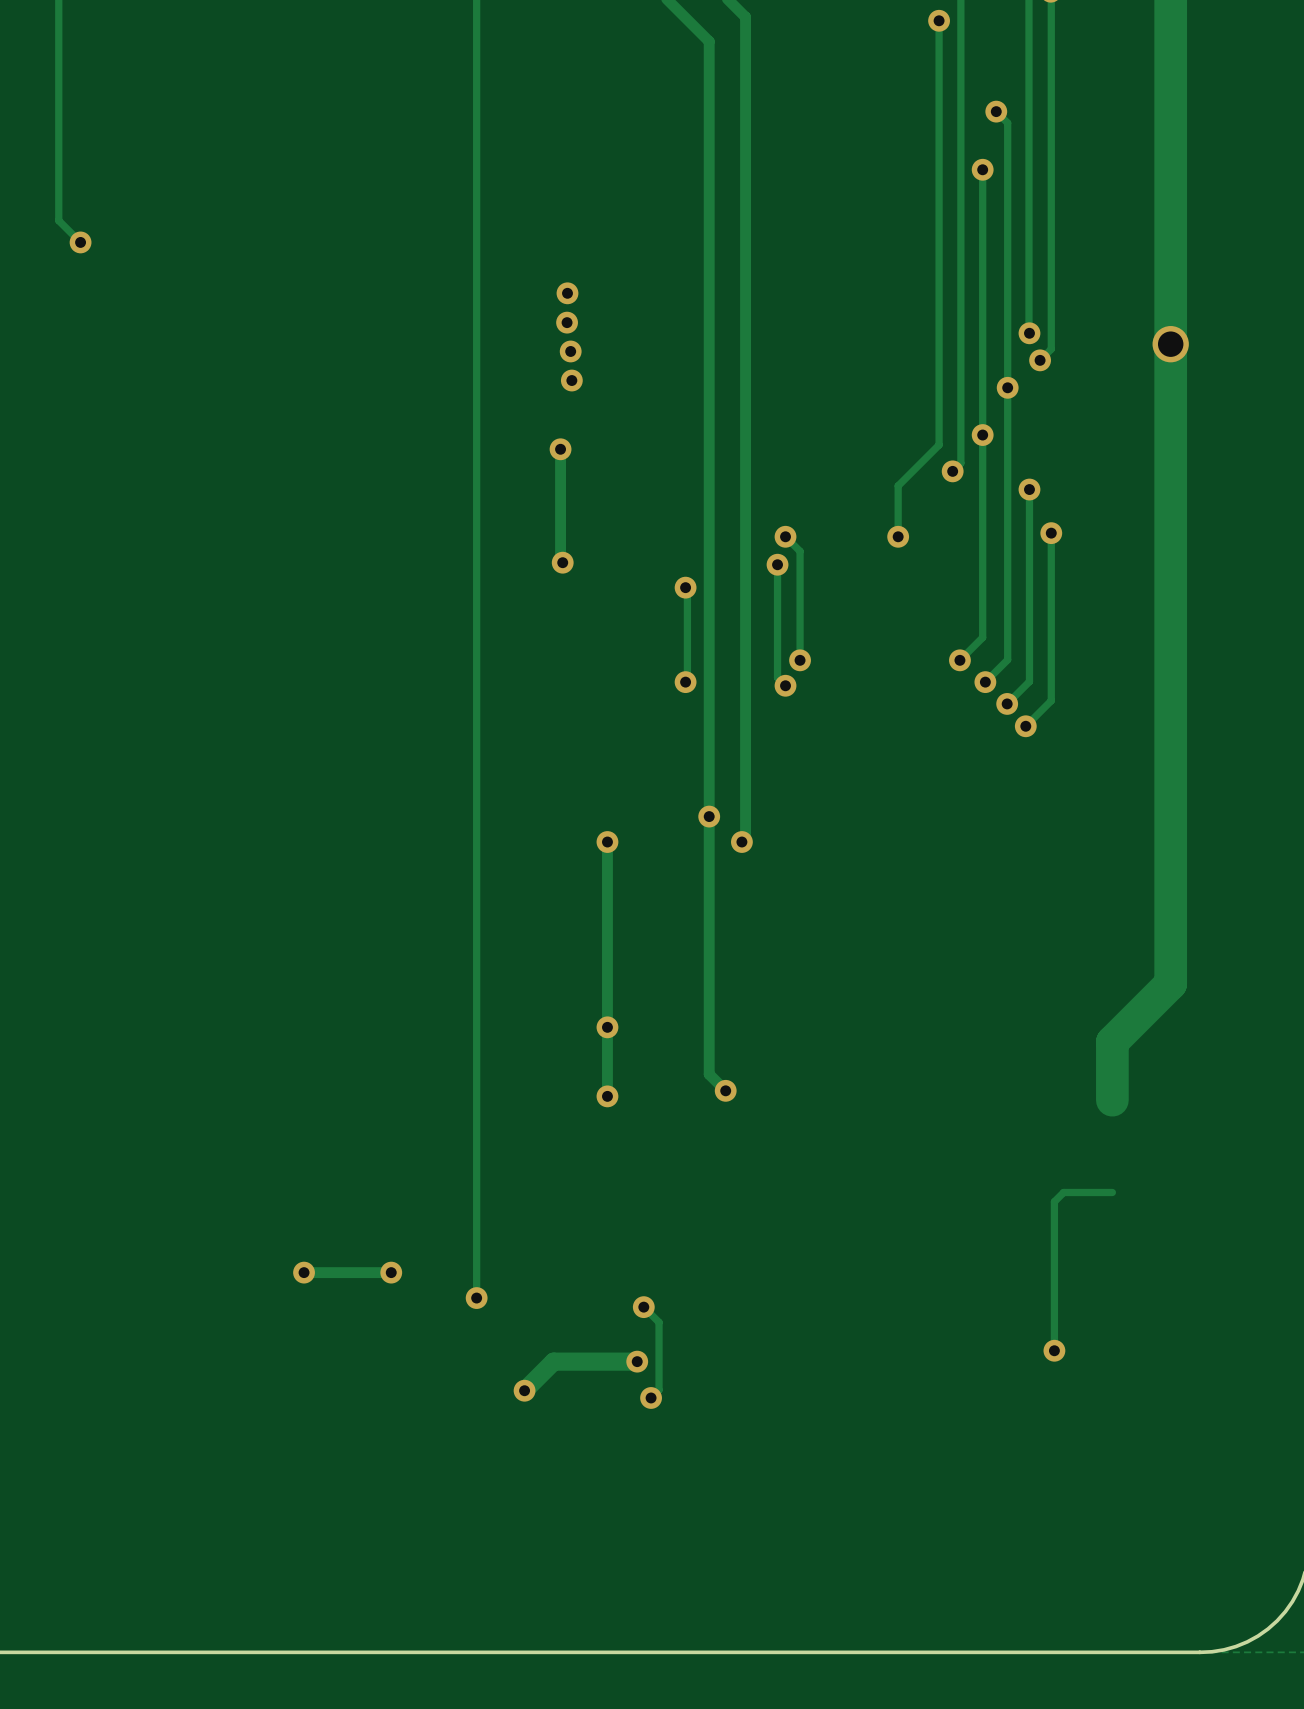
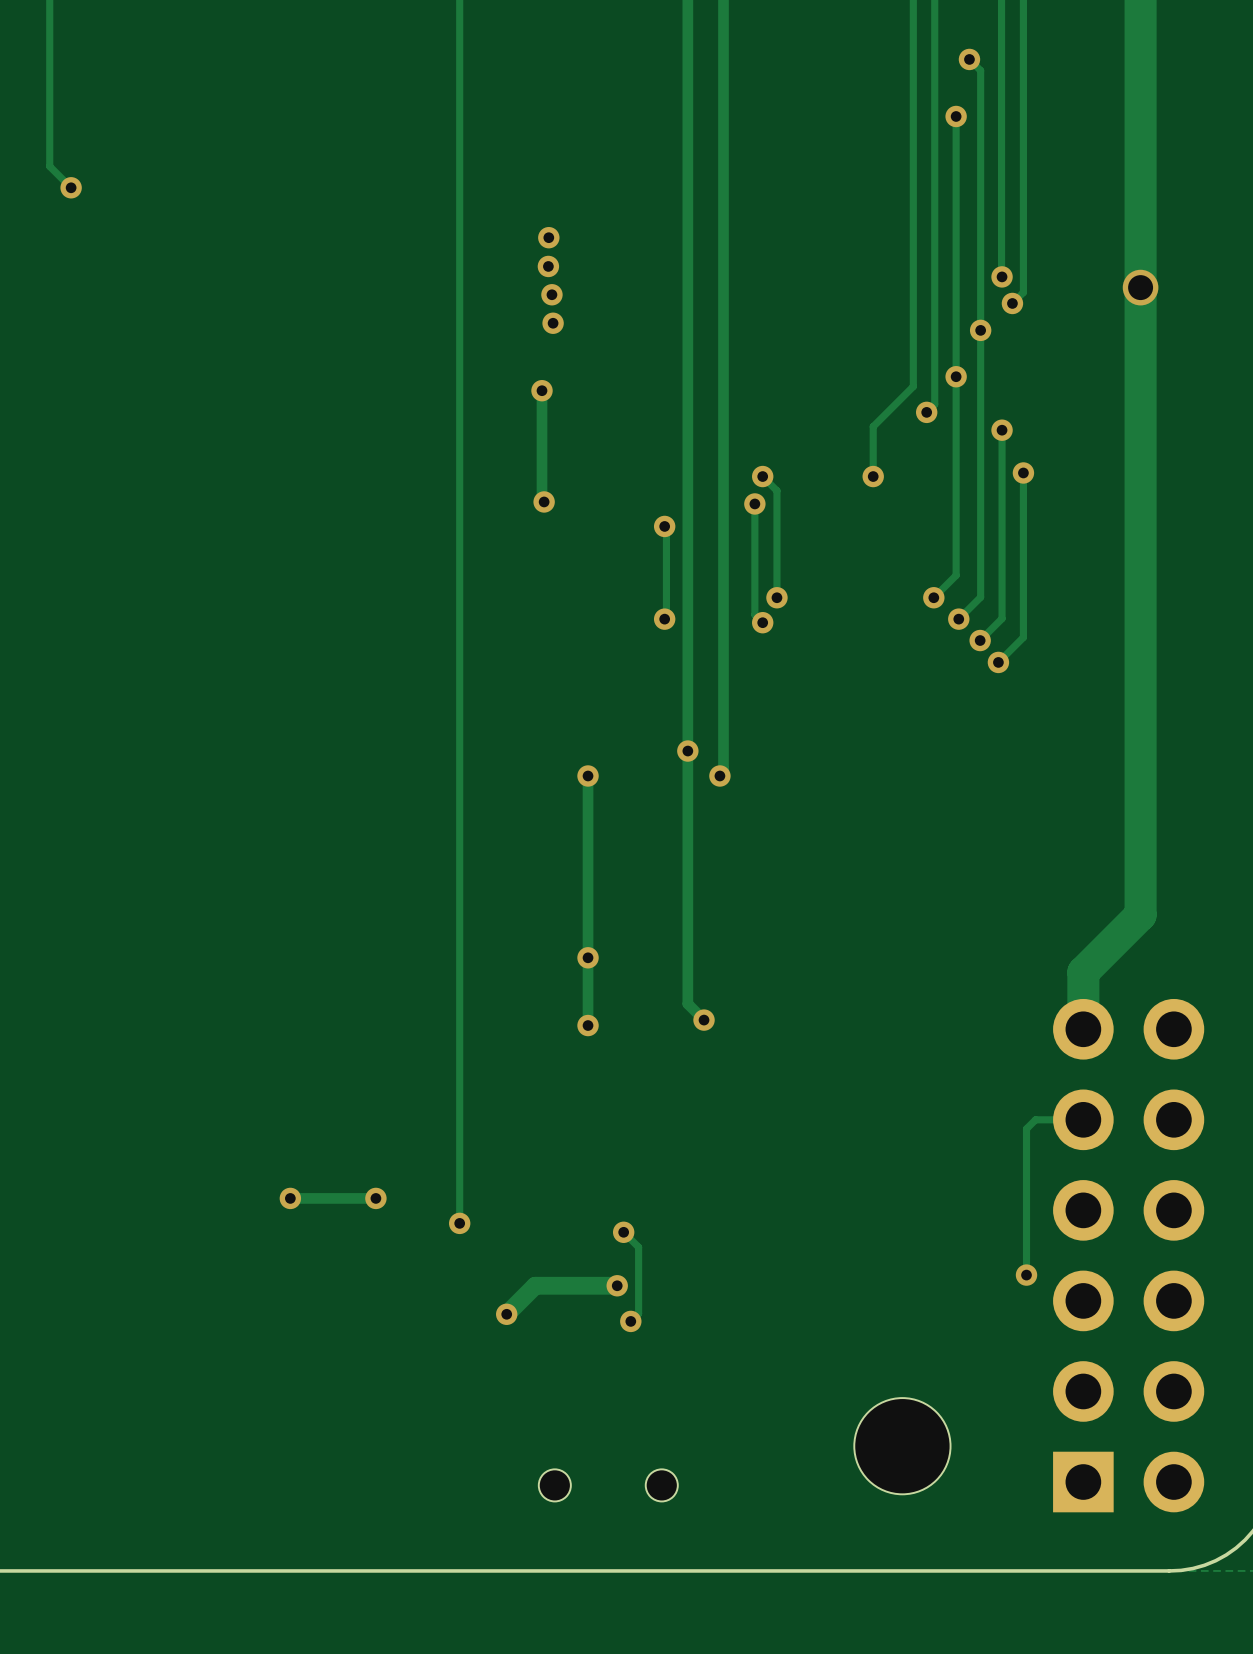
part: none -> (1128, 1255)
part: none -> (902, 1446)
part: none -> (608, 1485)

